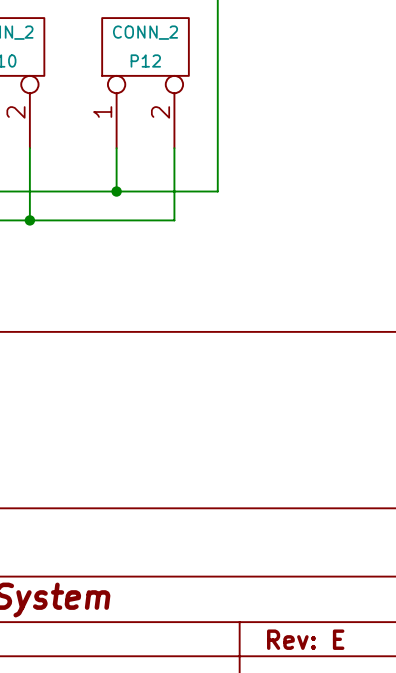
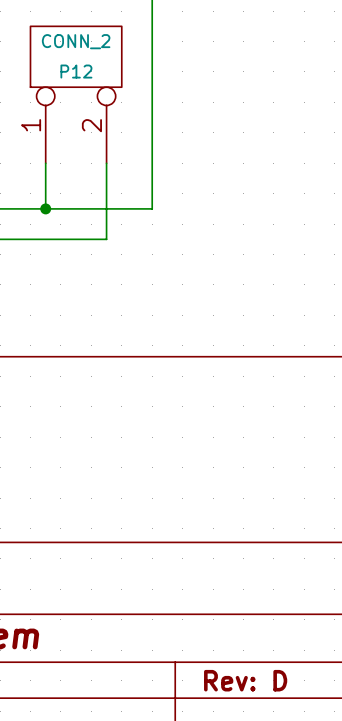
title block: Rev: E (305, 639) -> Rev: D (245, 680)

